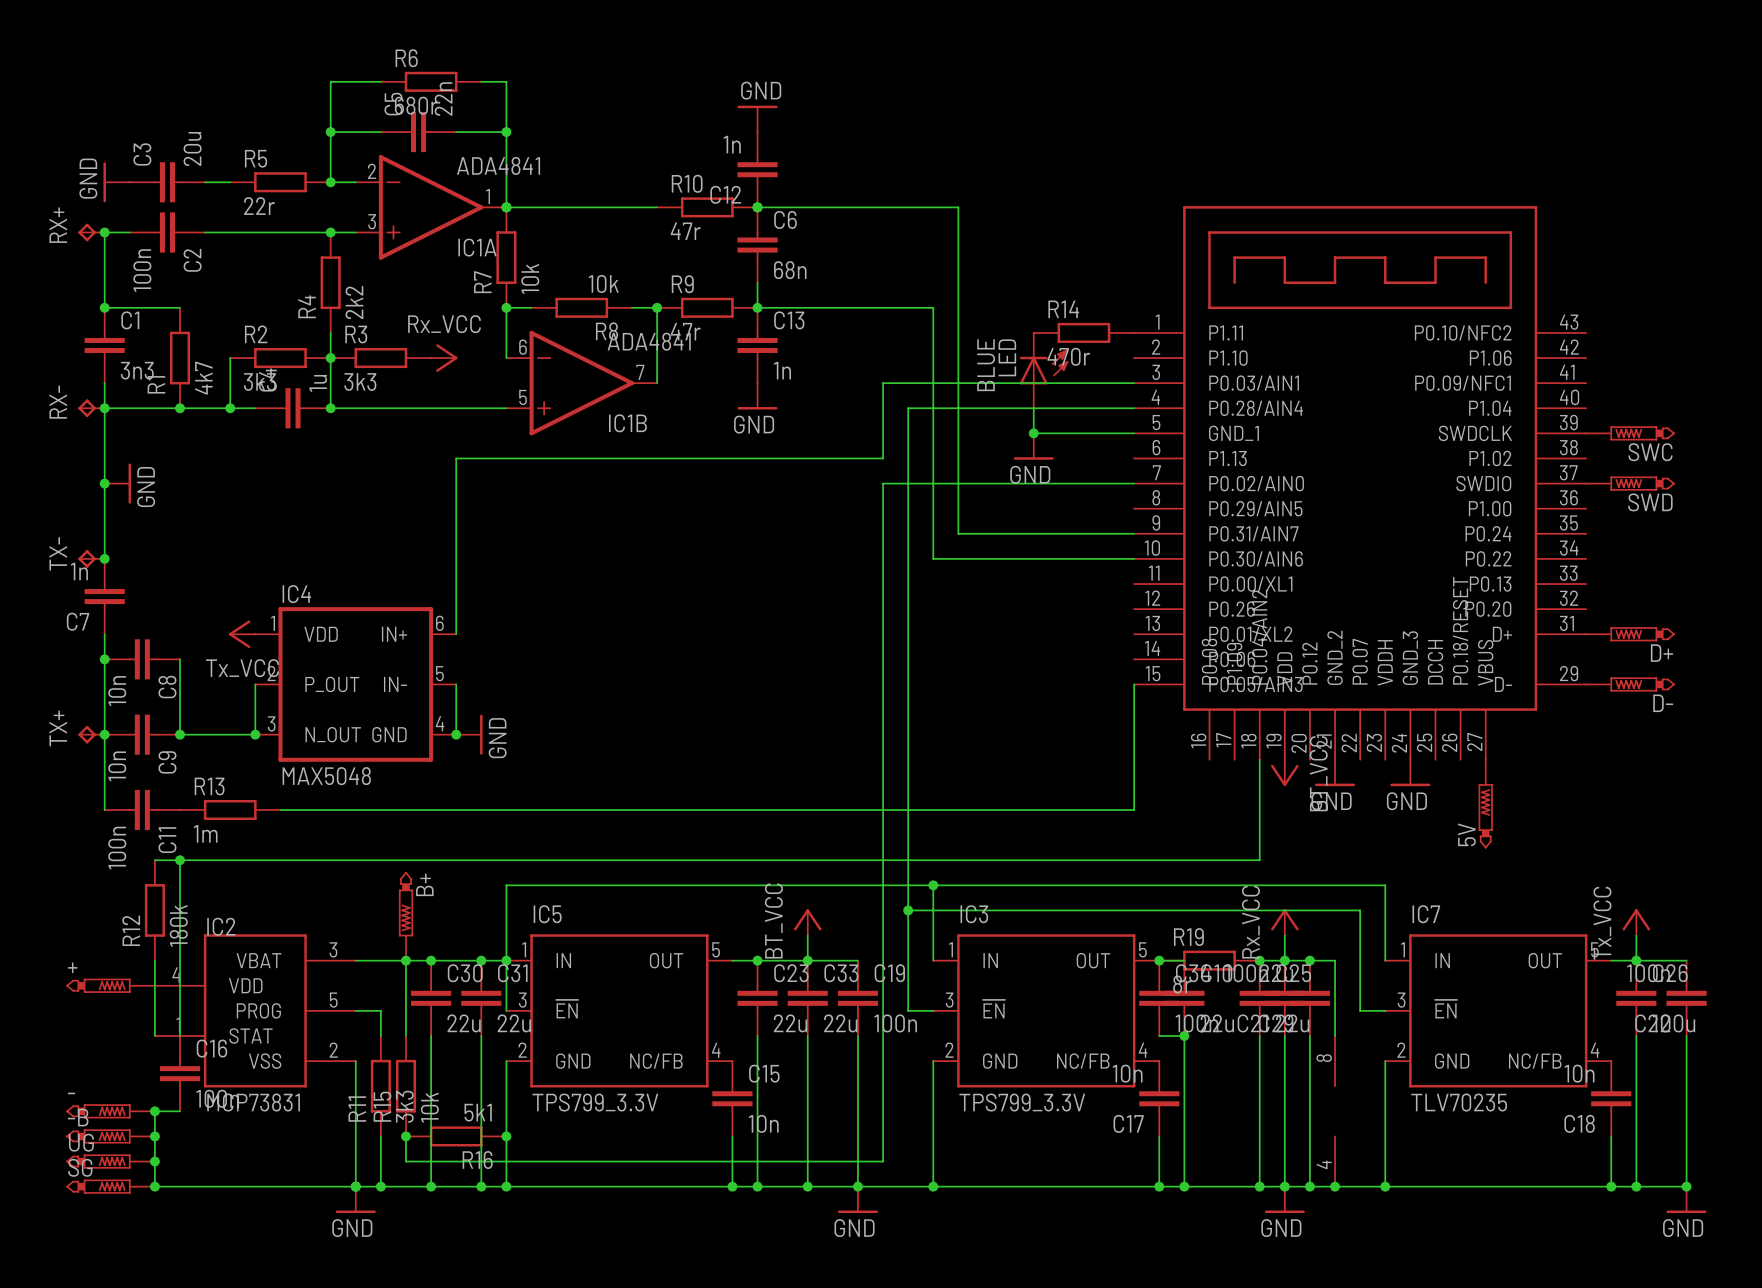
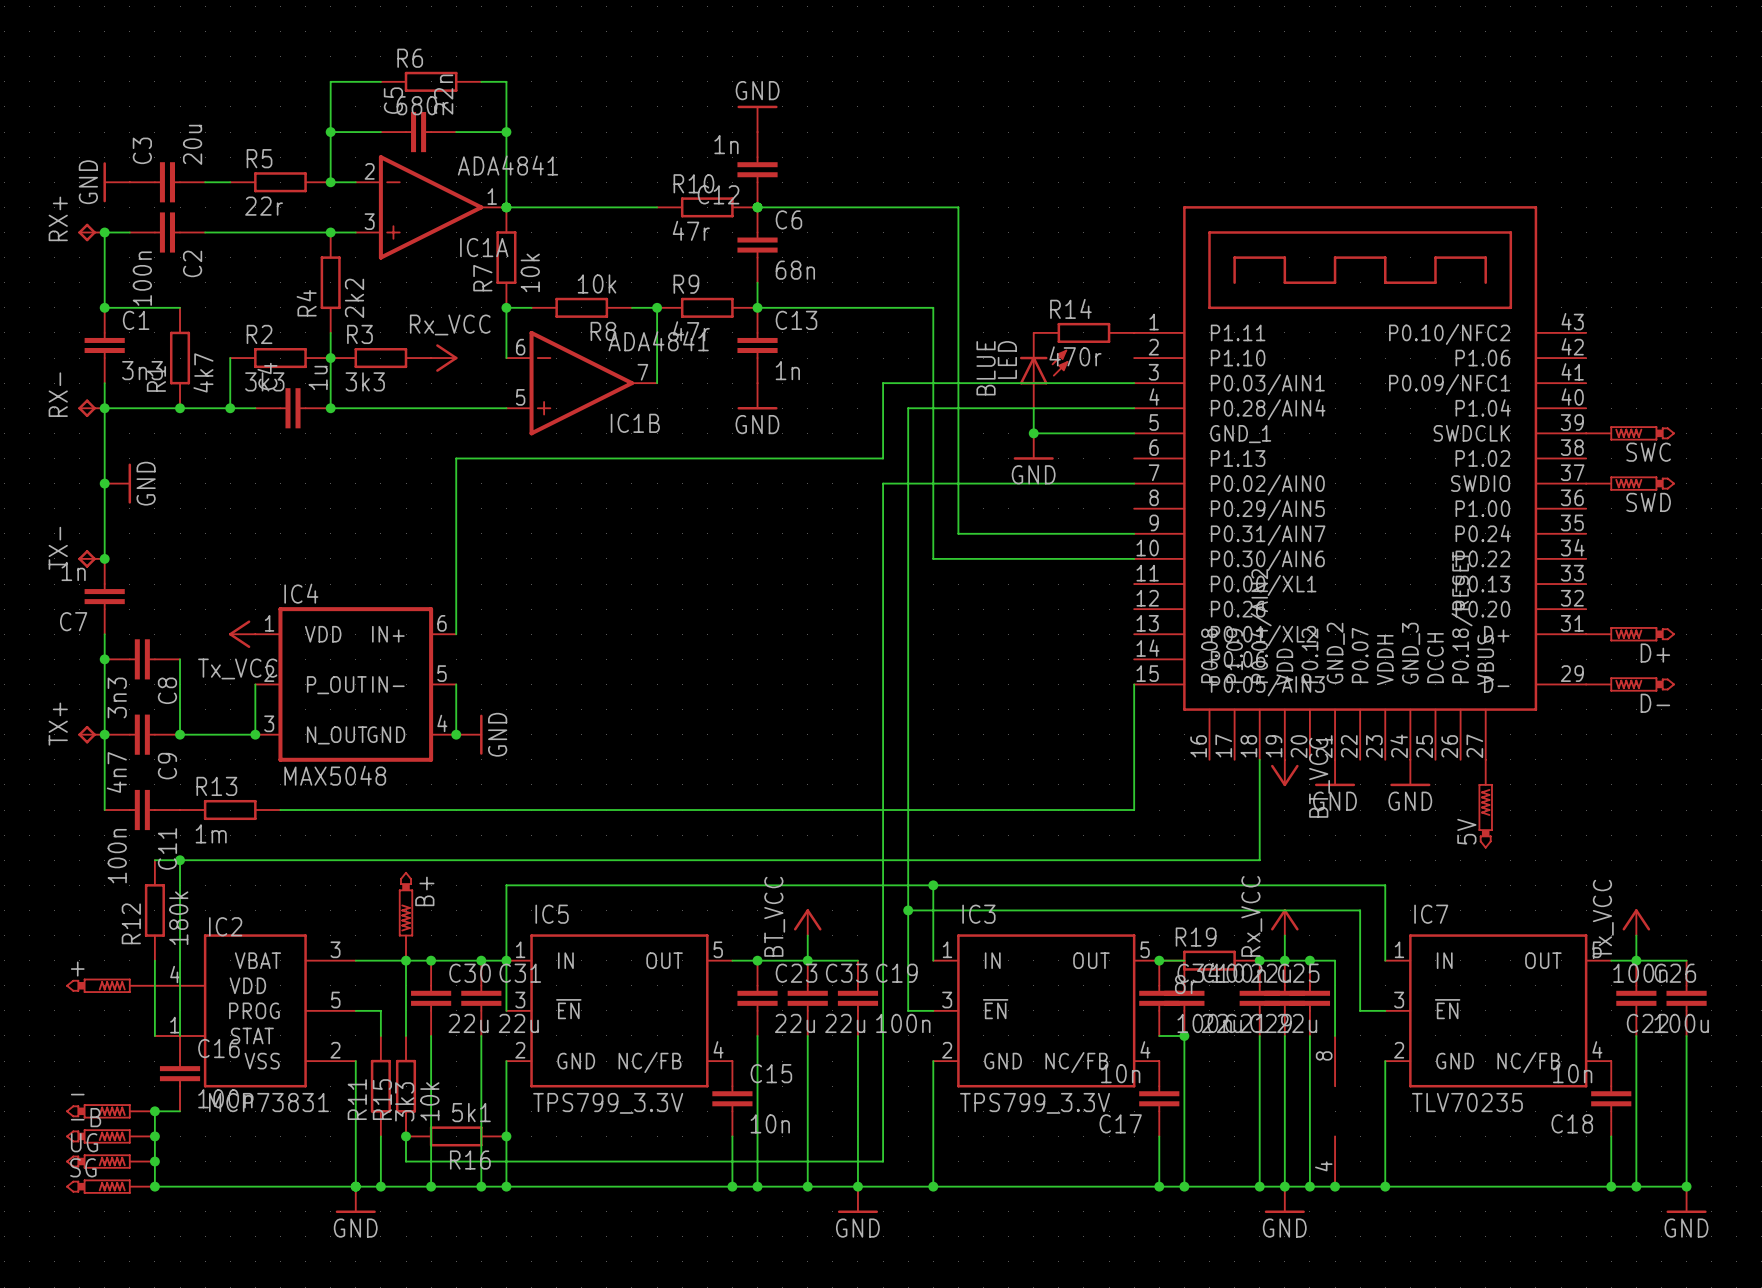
C8 value: 10n (117, 691) -> 3n3 (117, 697)
C9 value: 10n (117, 766) -> 4n7 (116, 772)

